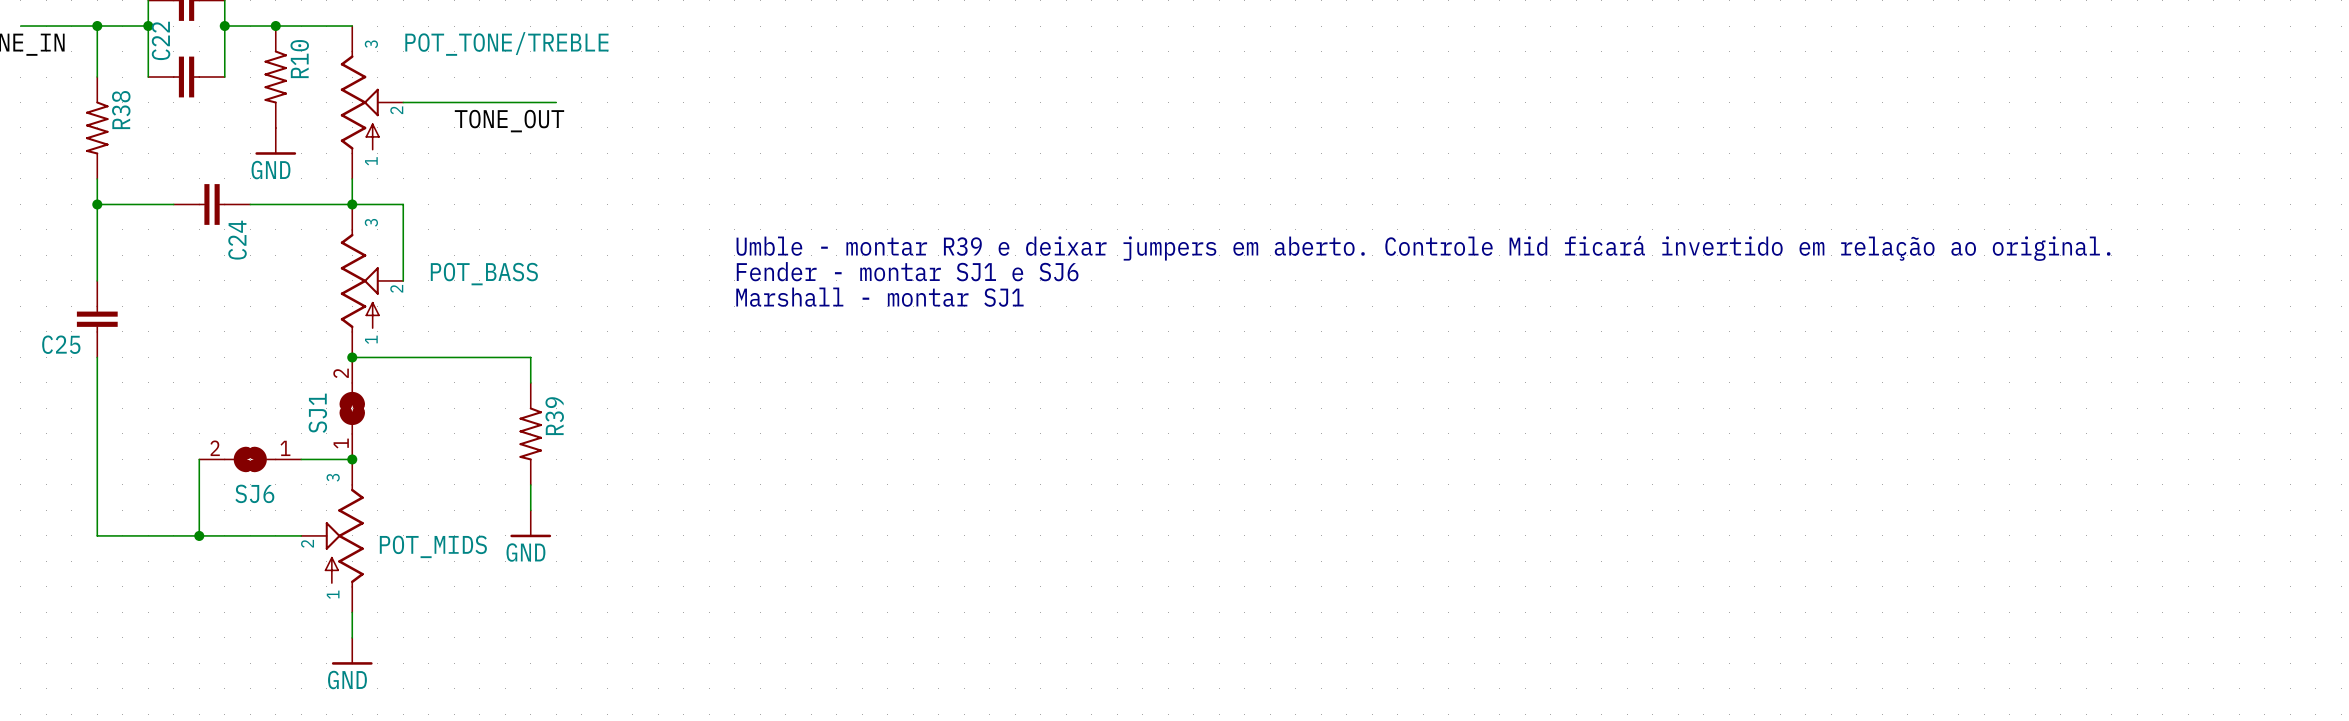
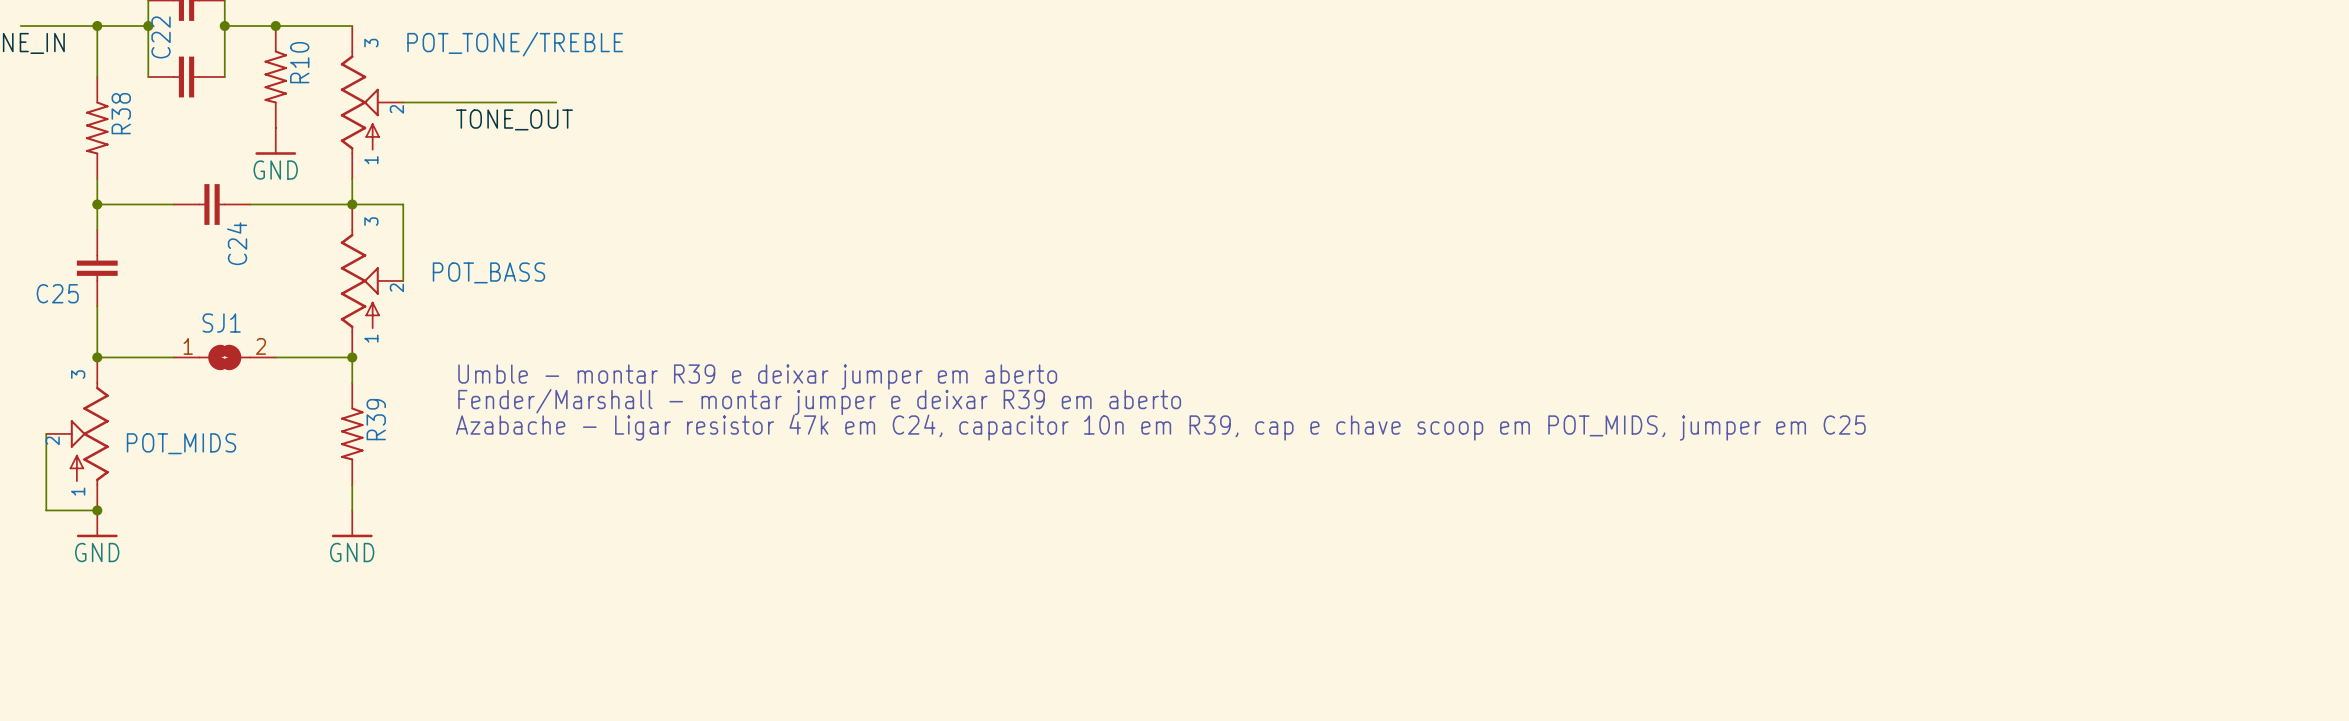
text: Umble - montar R39 e deixar jumpers em aberto. Controle Mid ficará invertido em relação ao original. (1423, 248) -> none
text: Fender - montar SJ1 e SJ6 (907, 271) -> none
text: Marshall - montar SJ1 (879, 297) -> none
wire: none -> (97, 306) (97, 357) (173, 357)
C25 position: (97, 319) -> (97, 268)
wire: (97, 357) (97, 535) (301, 535) -> none
junction: none -> (97, 357)
wire: none -> (275, 357) (352, 357) (352, 382)
wire: (352, 357) (530, 357) (530, 382) -> none
text: none -> Umble - montar R39 e deixar jumper em aberto (757, 377)
text: none -> Fender/Marshall - montar jumper e deixar R39 em aberto (819, 402)
SJ1 rotation: 0° (352, 408) -> 90° clockwise (224, 357)
SJ1 position: (352, 408) -> (224, 357)
text: none -> Azabache - Ligar resistor 47k em C24, capacitor 10n em R39, cap e chave scoop em POT_MIDS, jumper em C25 (1160, 427)
wire: none -> (46, 433) (46, 510) (97, 510)
POT_MIDS: none -> (77, 433)
R39 position: (530, 433) -> (352, 433)
wire: (199, 459) (199, 535) -> none
SJ6: (250, 459) -> none
wire: (301, 459) (352, 459) -> none
junction: (352, 459) -> none
wire: (530, 484) (530, 510) -> none
junction: none -> (97, 510)
power symbol: none -> GND (97, 523)
power symbol: none -> GND (352, 523)
power symbol: GND (530, 523) -> none
junction: (199, 535) -> none
POT_MIDS: (332, 535) -> none
wire: (352, 612) (352, 637) -> (352, 484) (352, 510)
power symbol: GND (352, 651) -> none

